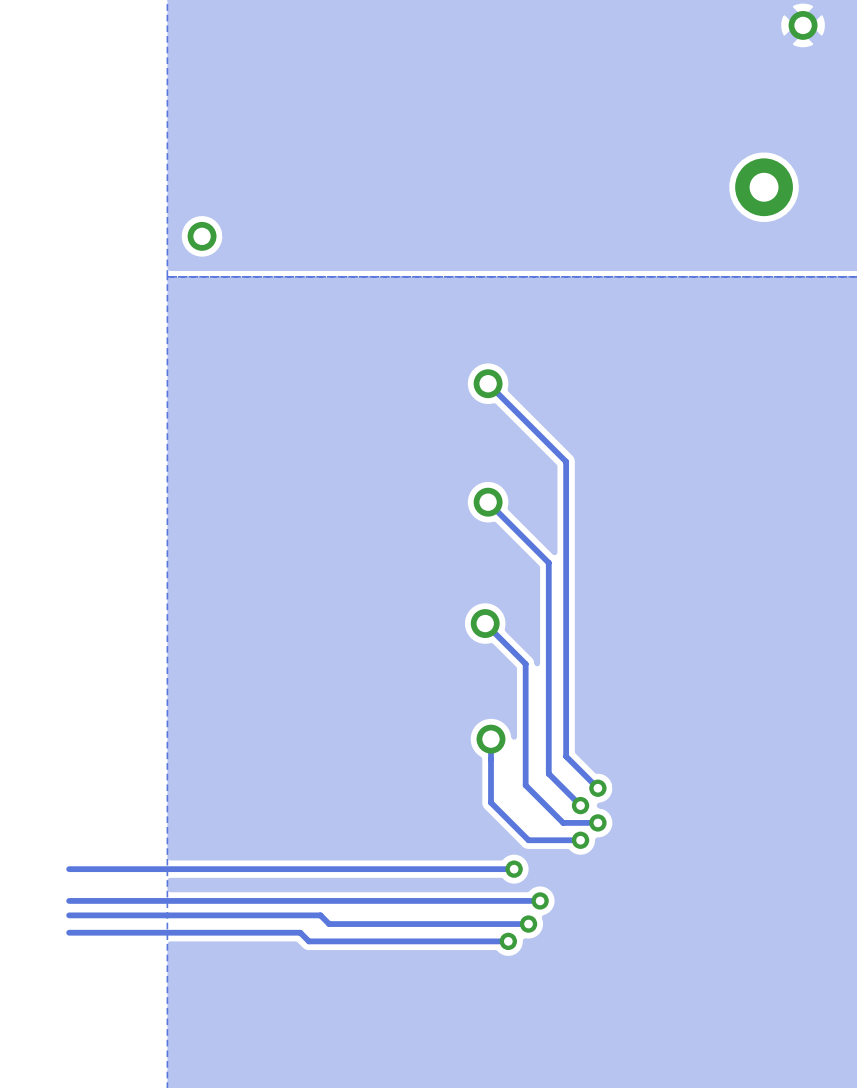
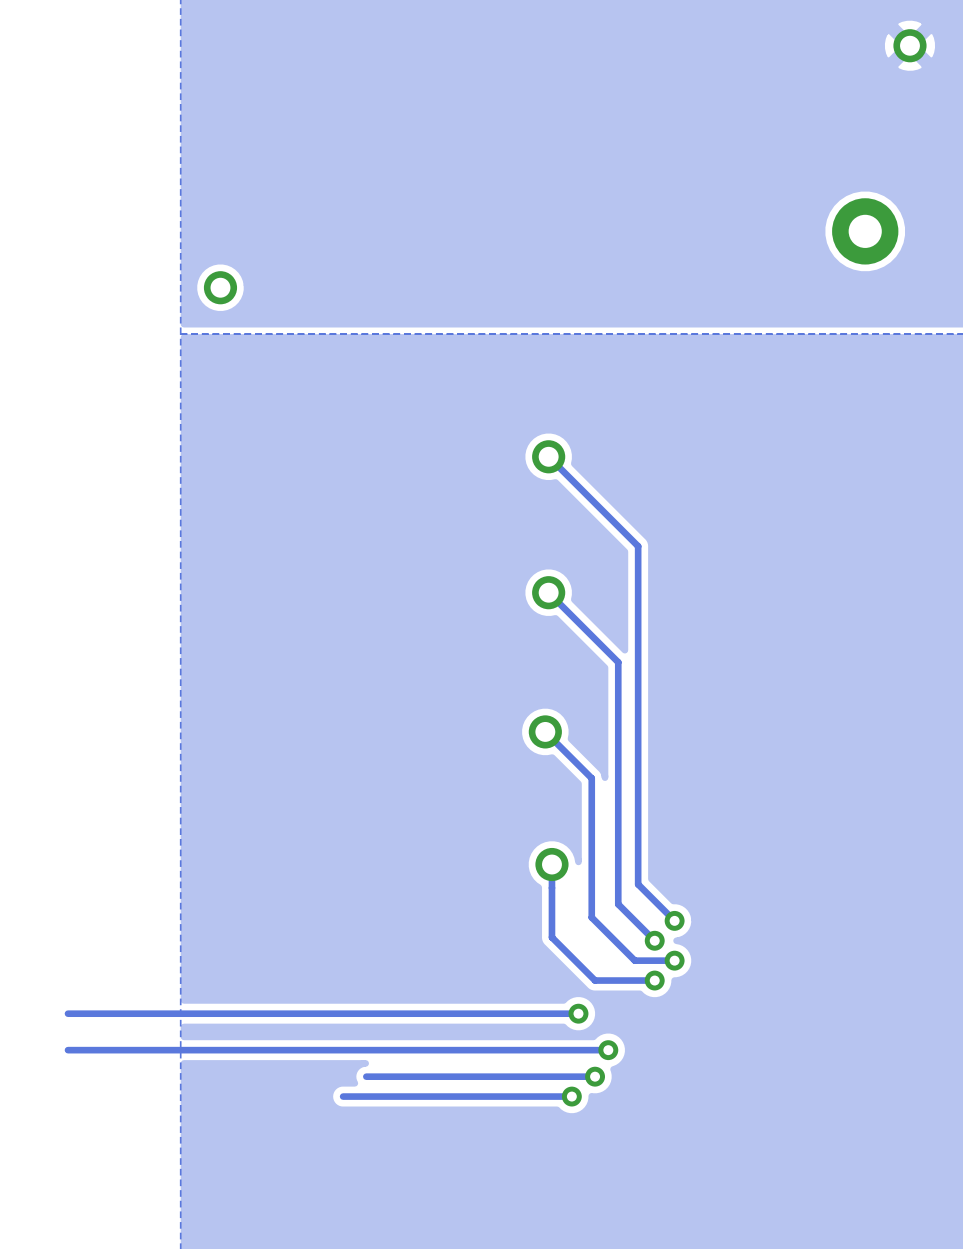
track: (69, 915) (320, 915) (329, 924) -> none
track: (69, 932) (300, 932) (308, 941) -> none

